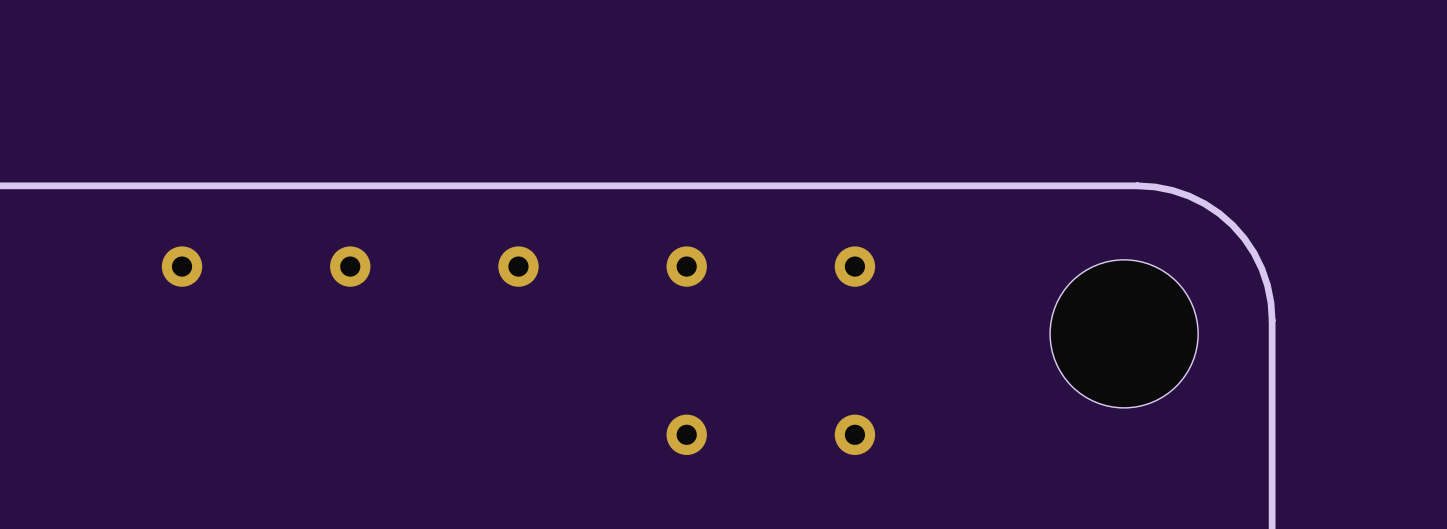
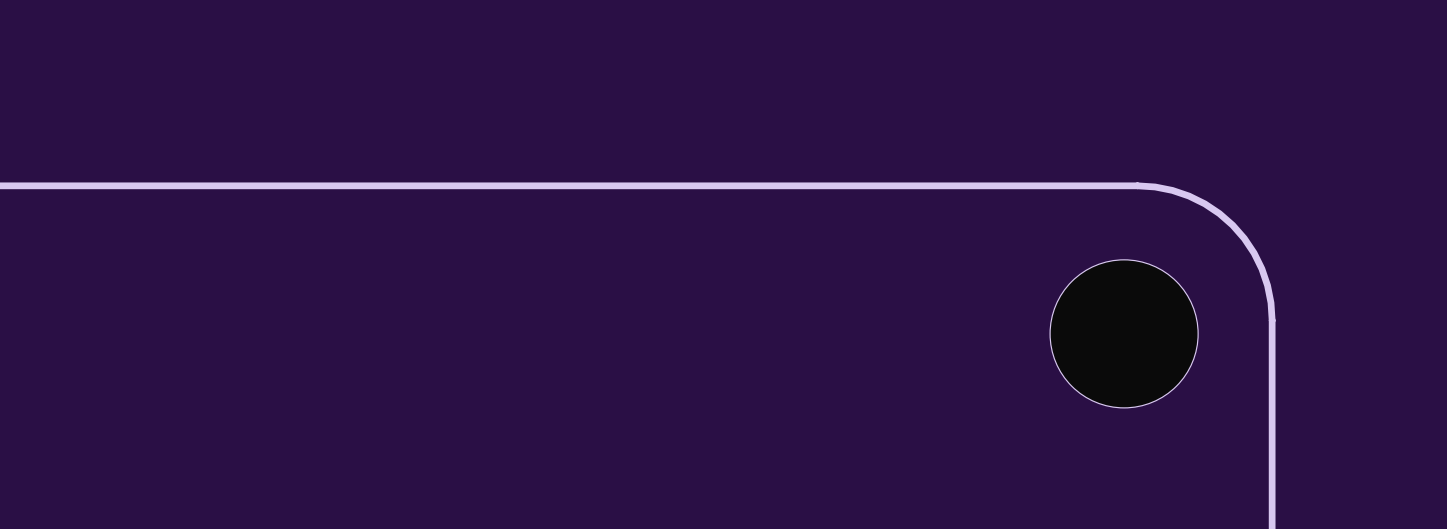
via: (182, 266) -> none
via: (350, 266) -> none
via: (518, 266) -> none
via: (686, 266) -> none
via: (854, 266) -> none
via: (686, 434) -> none
via: (854, 434) -> none

